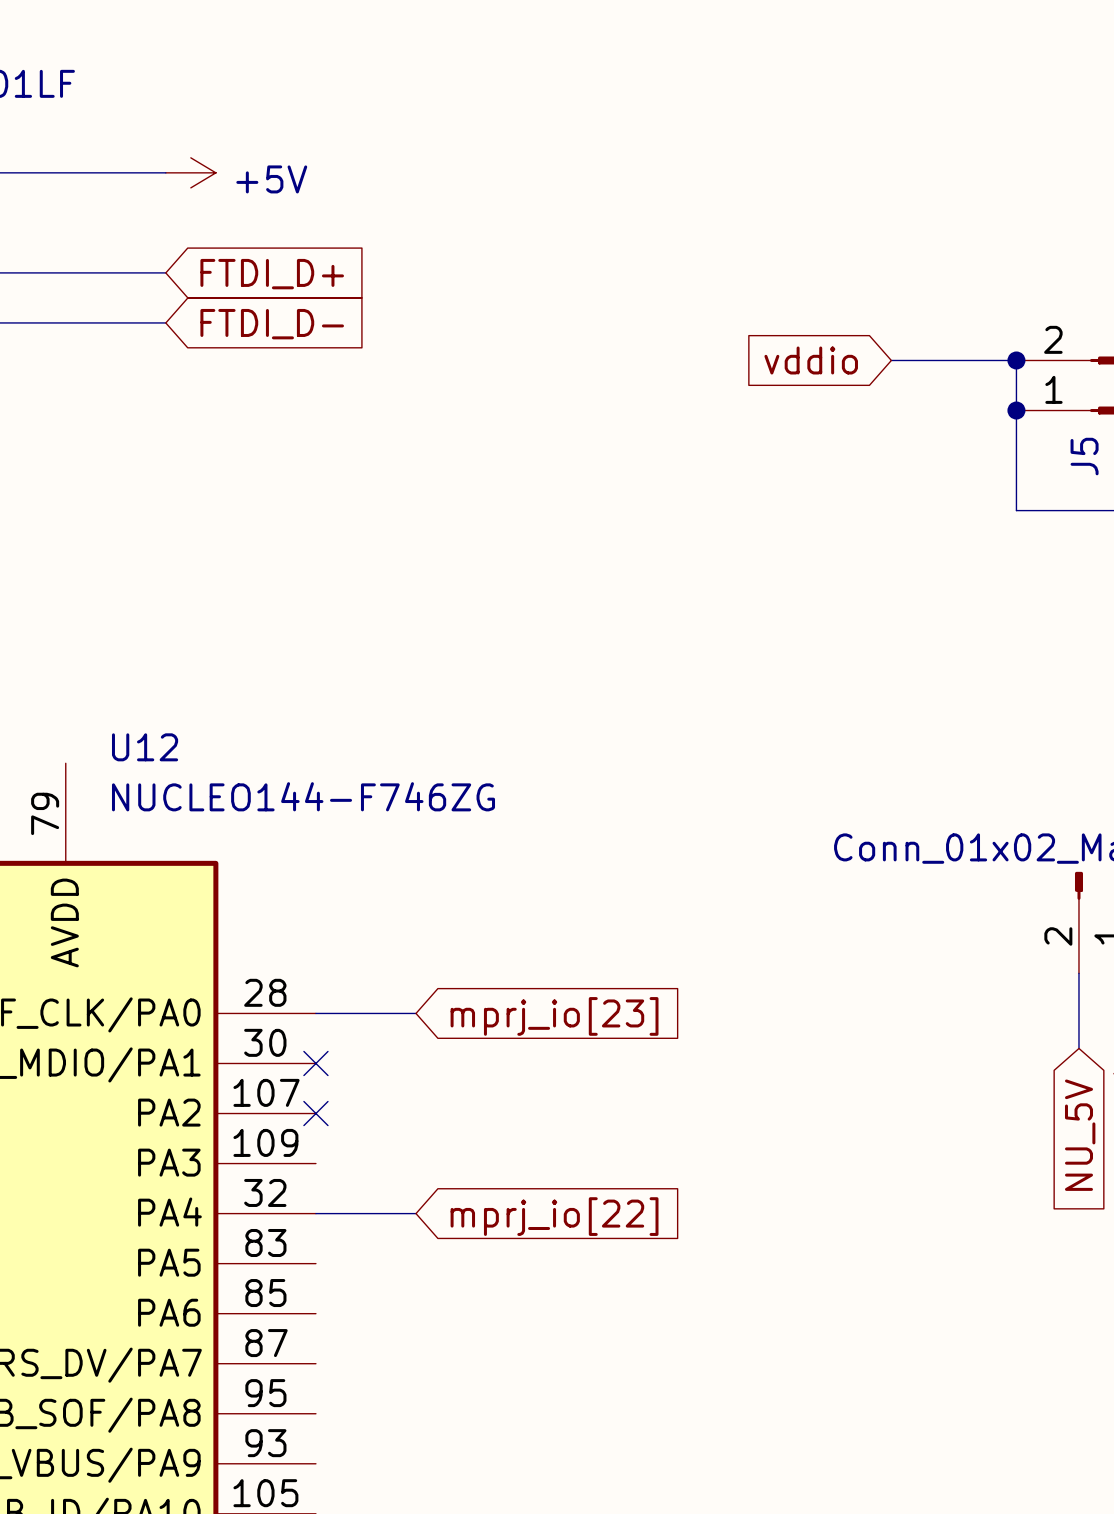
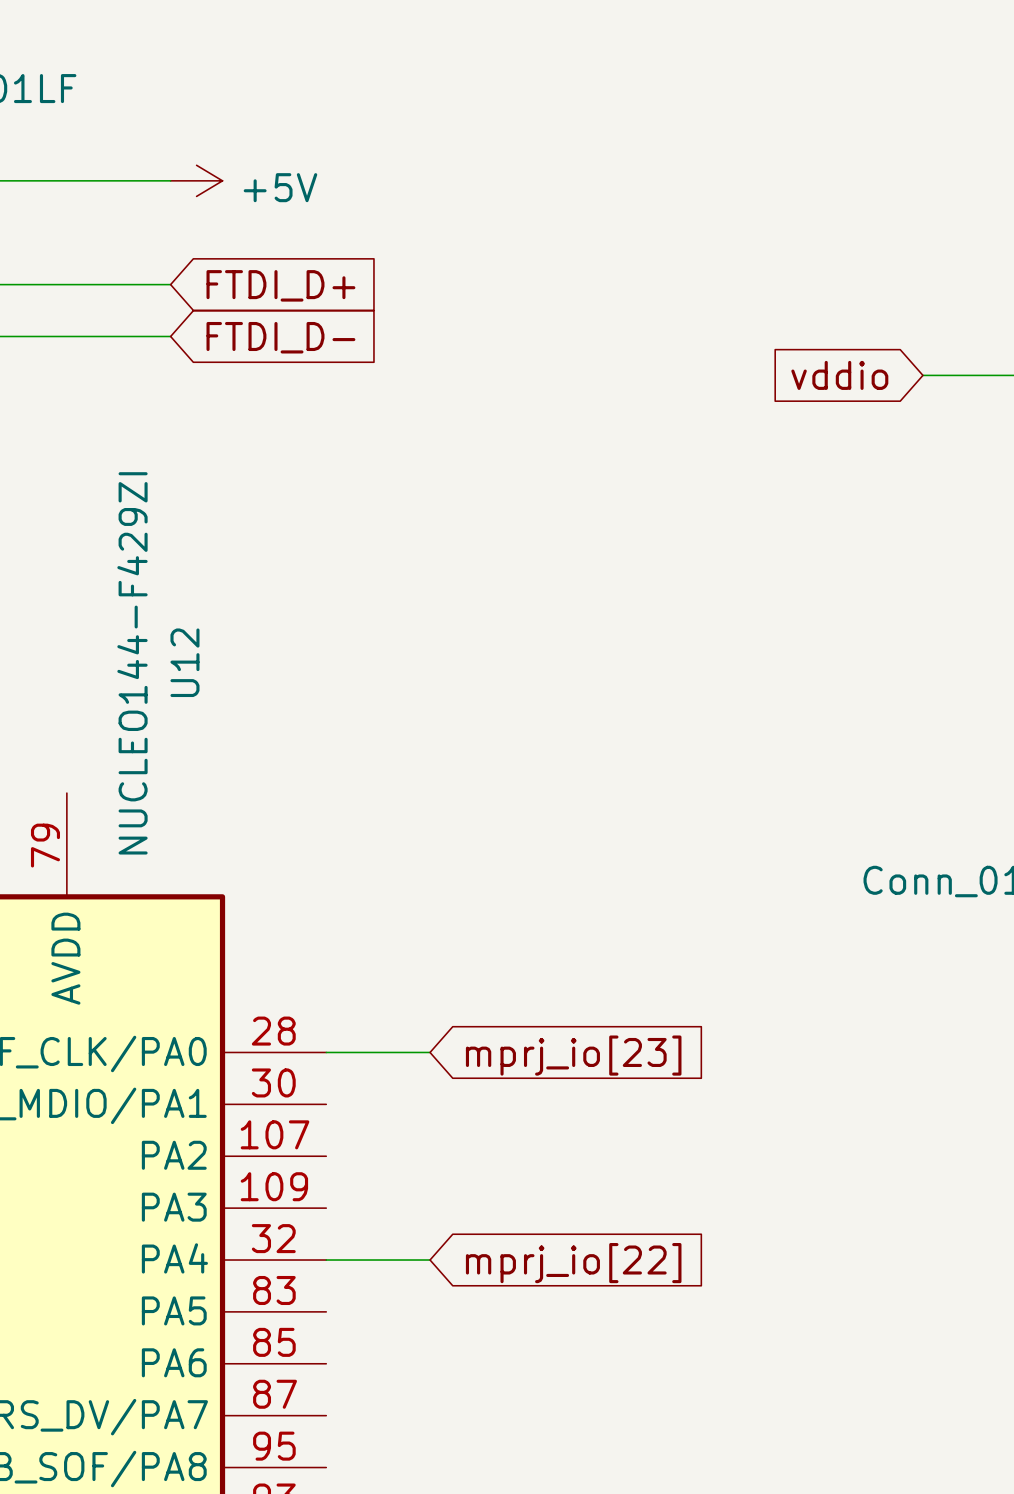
U12 name rotation: 0° (145, 747) -> 90° counterclockwise (184, 662)
U12 name position: U12 (145, 747) -> U12 (184, 662)
U12 value: NUCLEO144-F746ZG (303, 796) -> NUCLEO144-F429ZI (132, 663)
no-connect mark: (315, 1063) -> none
no-connect mark: (315, 1113) -> none

